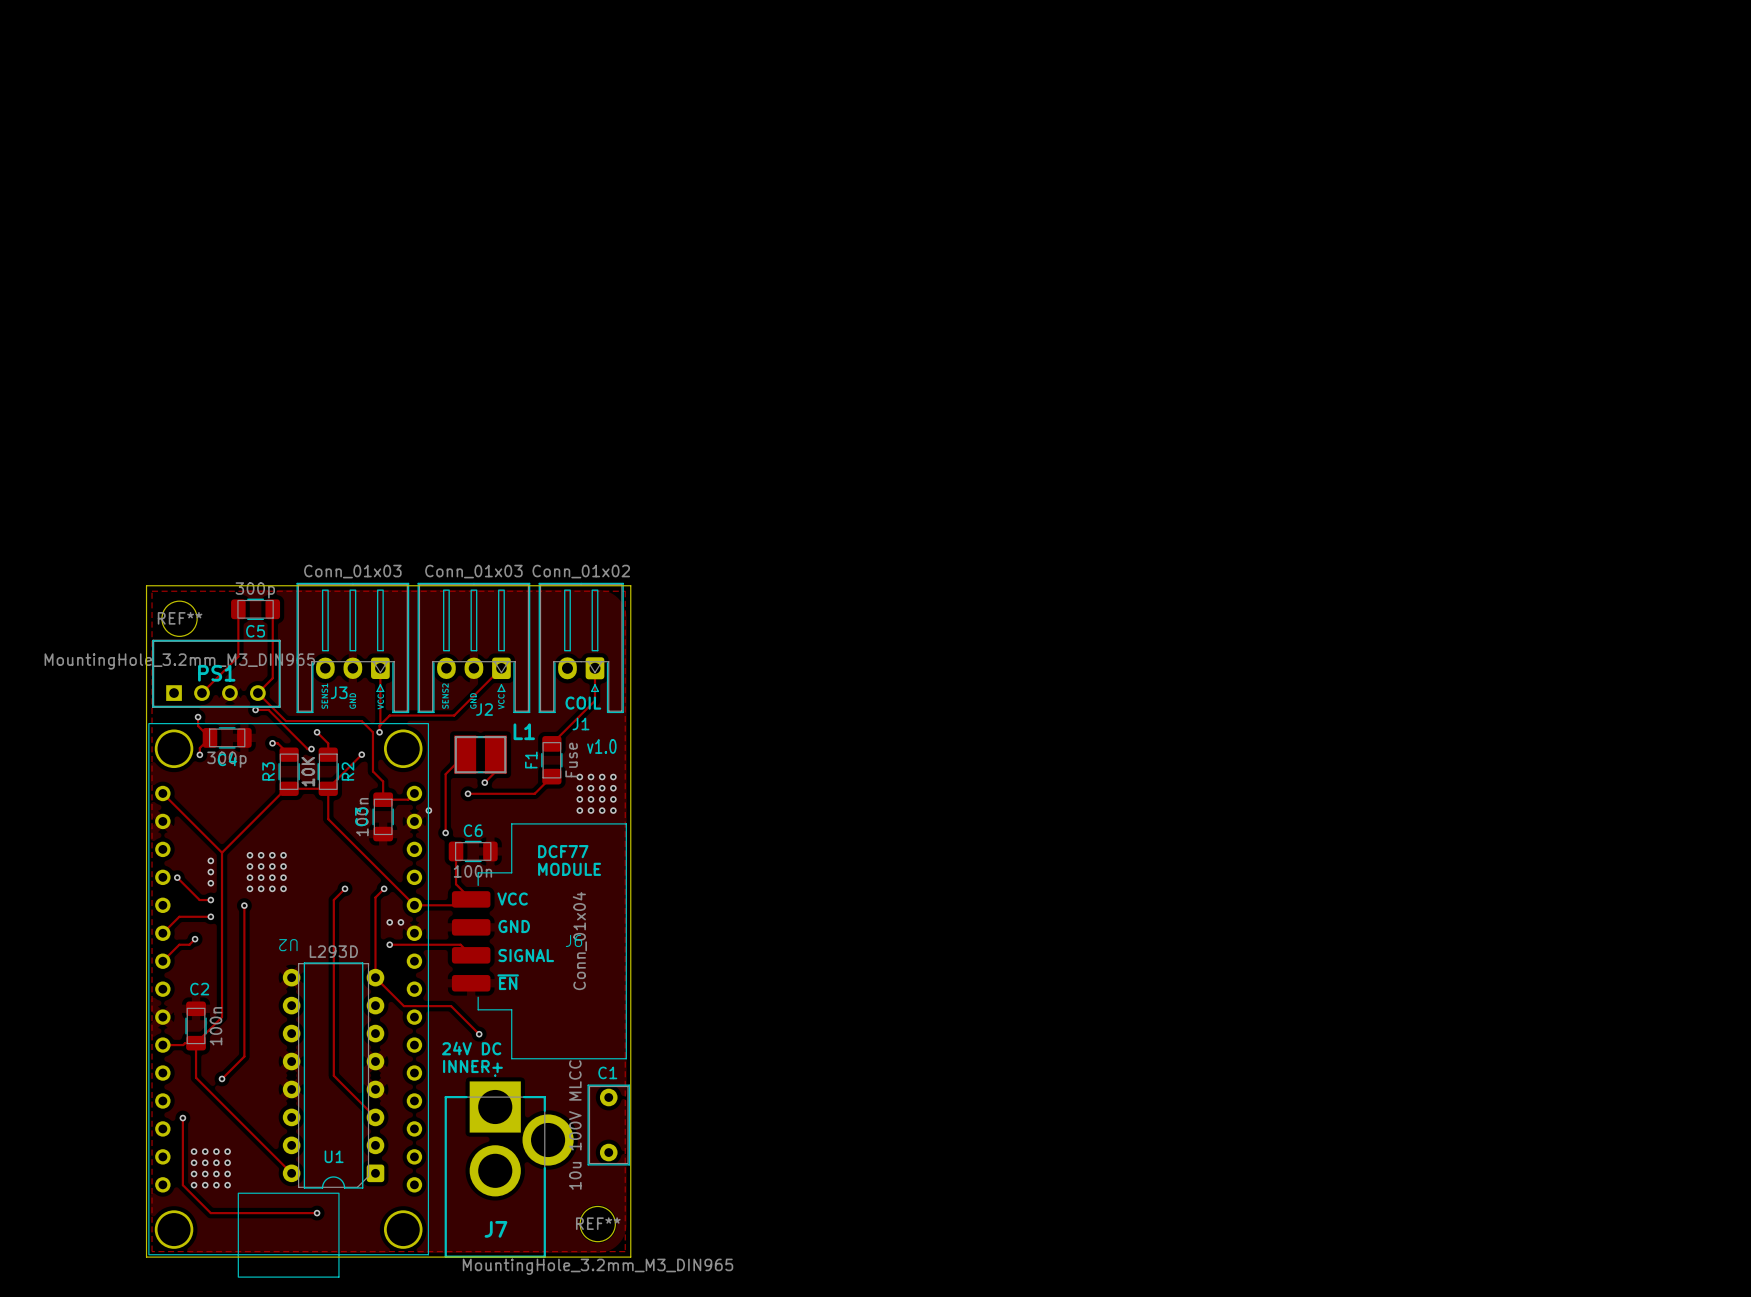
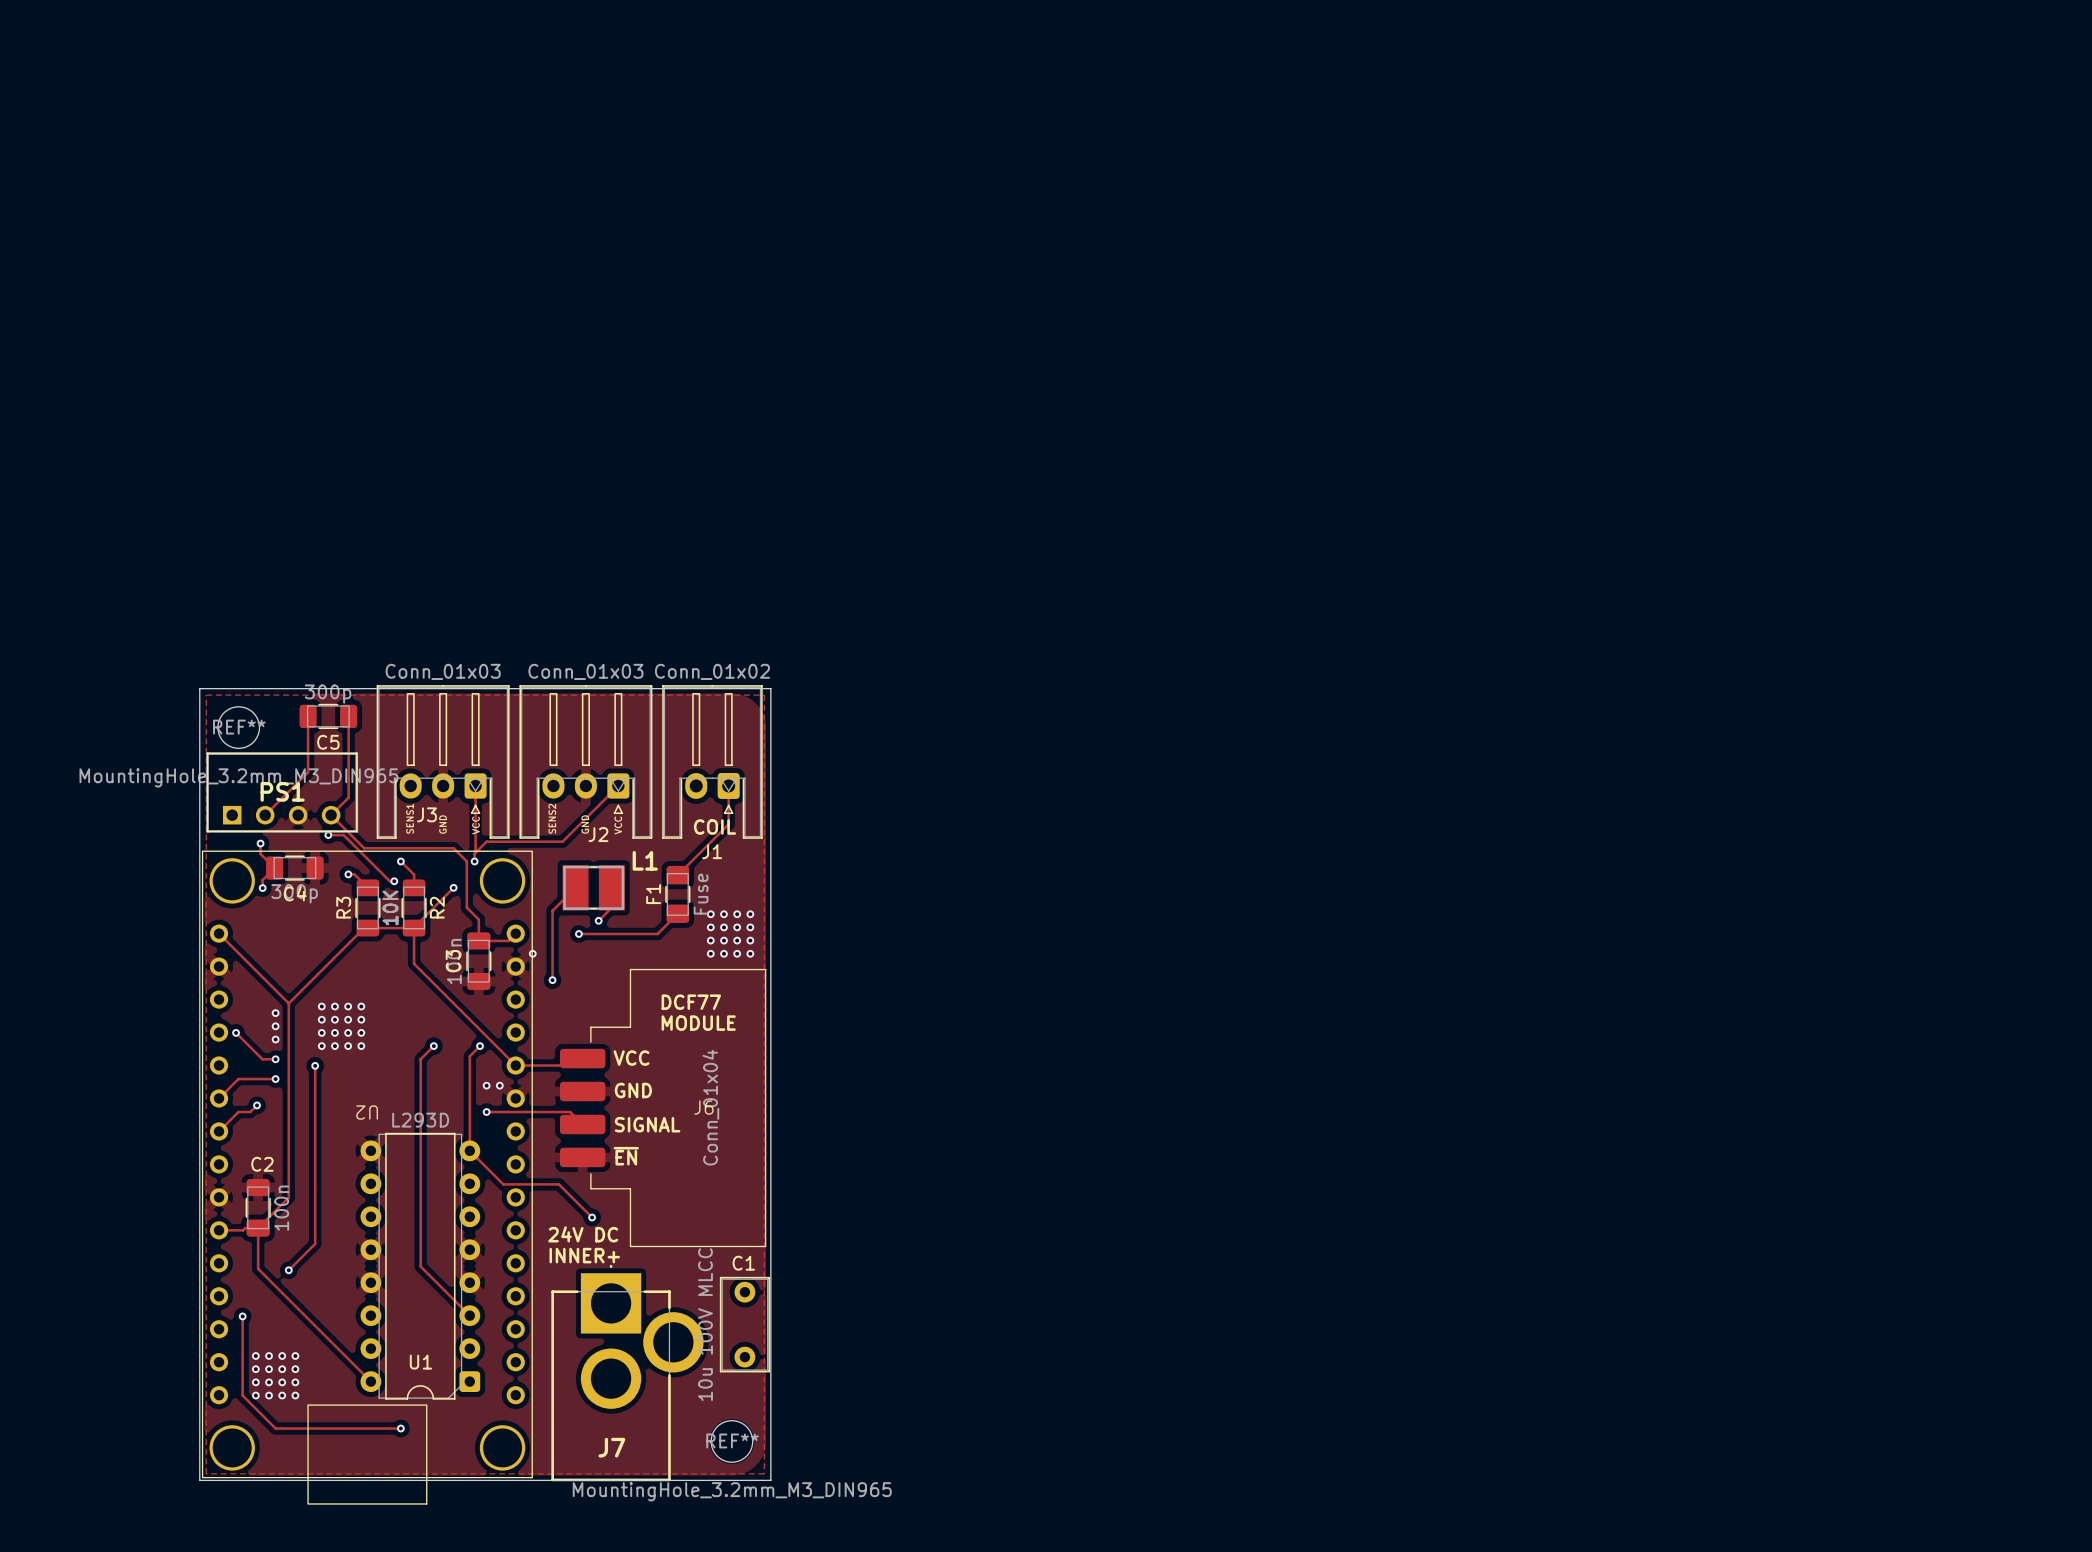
text: v1.0 (601, 746) -> none
track: (456, 851) (456, 884) (471, 899) -> none
C6: 100n (473, 851) -> none

